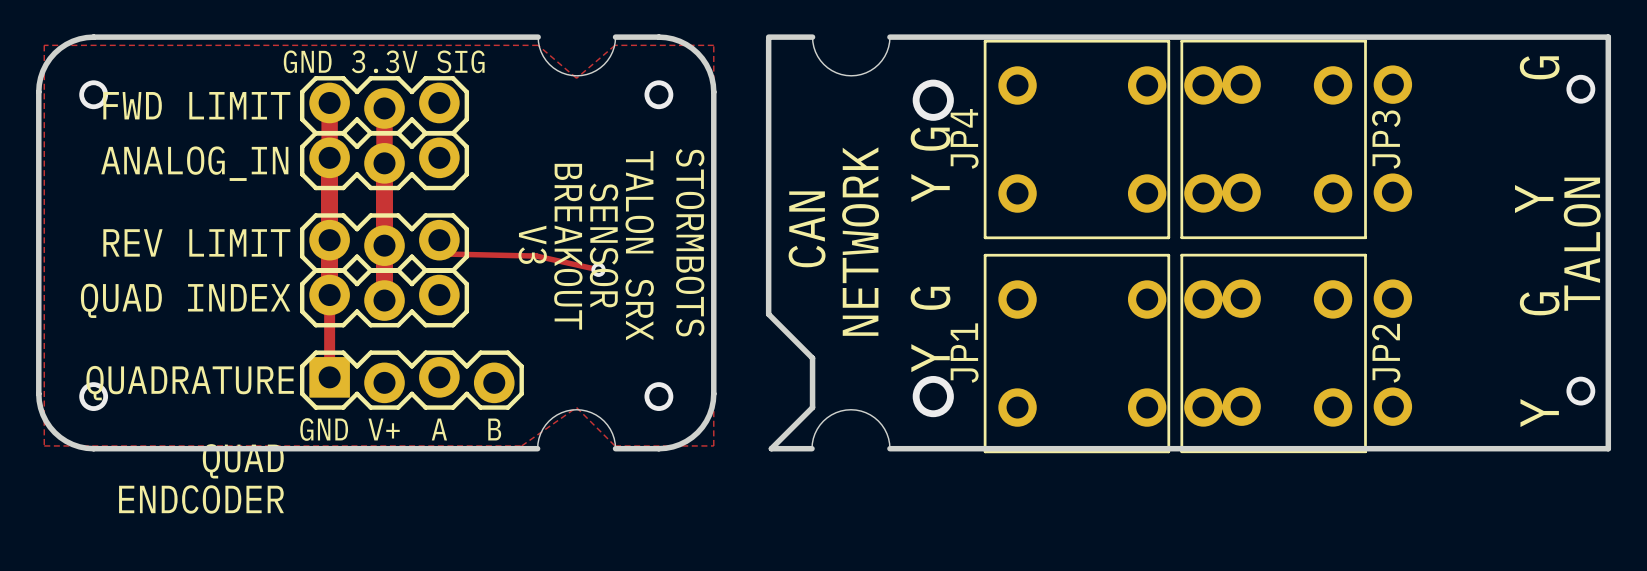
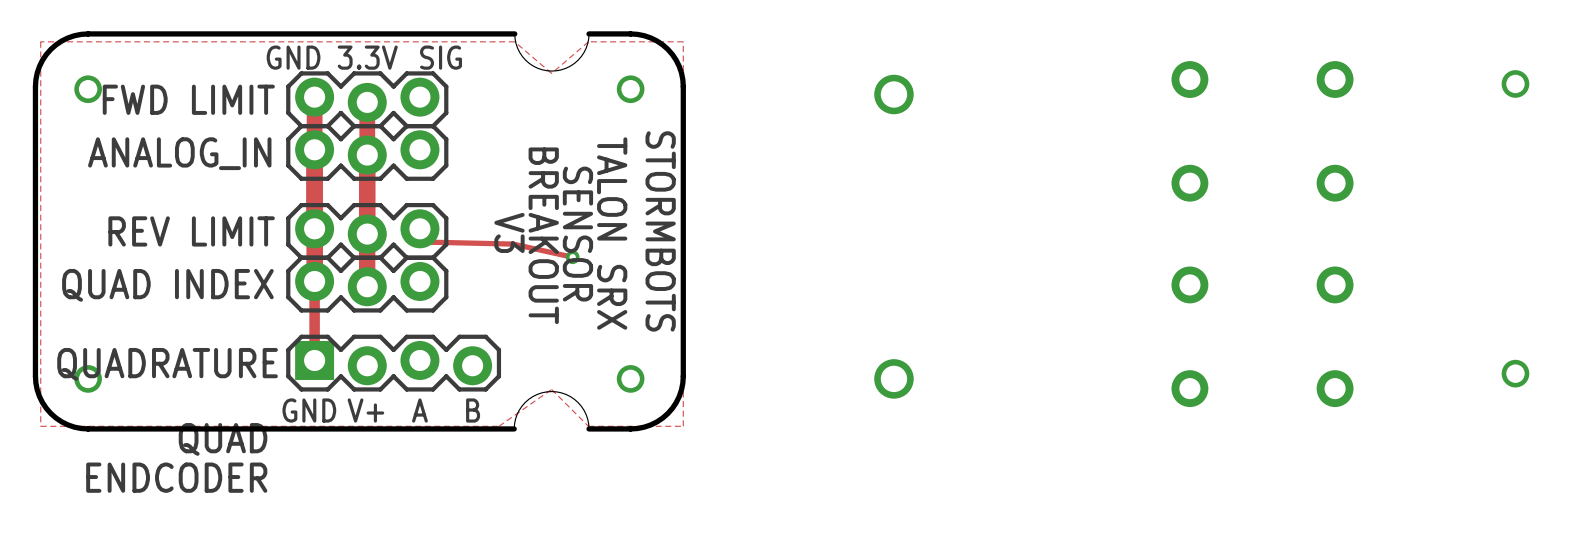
board edge: (768, 37) (812, 37) (815, 51) (823, 64) (836, 72) (851, 75) (866, 72) (878, 64) (886, 51) (889, 37) (1608, 37) (1608, 448) (889, 448) (886, 433) (878, 421) (865, 412) (850, 409) (836, 412) (823, 421) (814, 433) (812, 448) (771, 448) (812, 407) (812, 358) (768, 314) (768, 37) -> none
text: G (1539, 67) -> none
text: G (930, 139) -> none
JP4: (1076, 139) -> none
JP3: (1273, 139) -> none
text: Y (930, 188) -> none
text: Y (1534, 199) -> none
text: CAN (807, 229) -> none
text: NETWORK (860, 241) -> none
text: TALON (1582, 244) -> none
text: G (930, 298) -> none
text: G (1539, 303) -> none
JP1: (1076, 353) -> none
JP2: (1273, 353) -> none
text: Y (930, 358) -> none
text: Y (1539, 413) -> none

